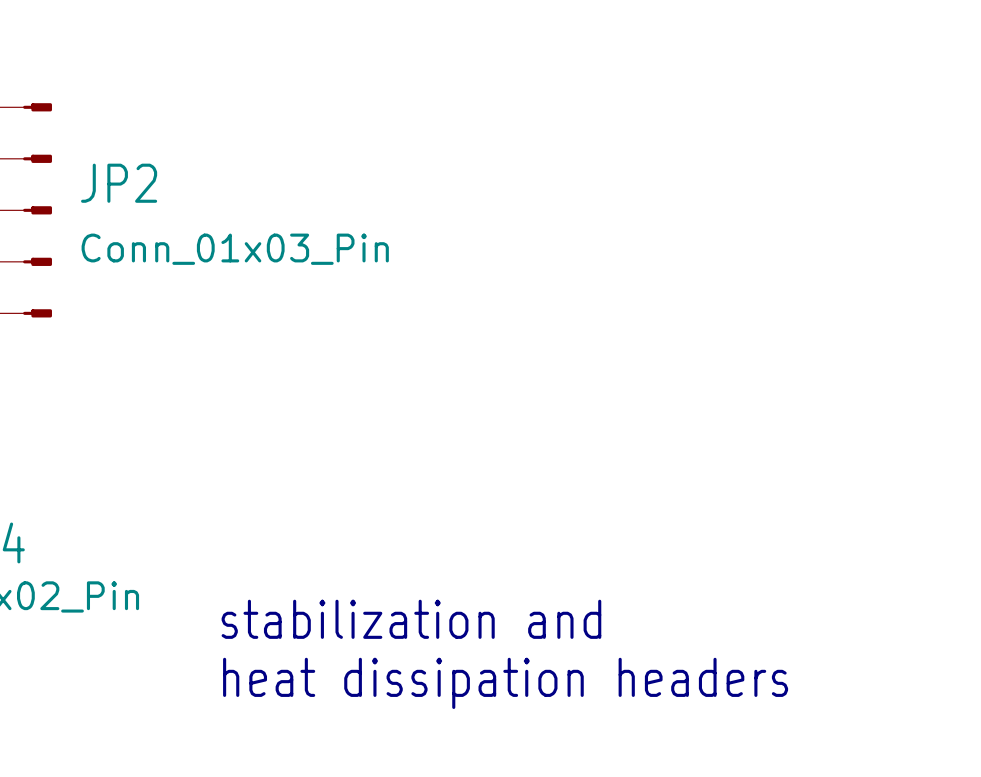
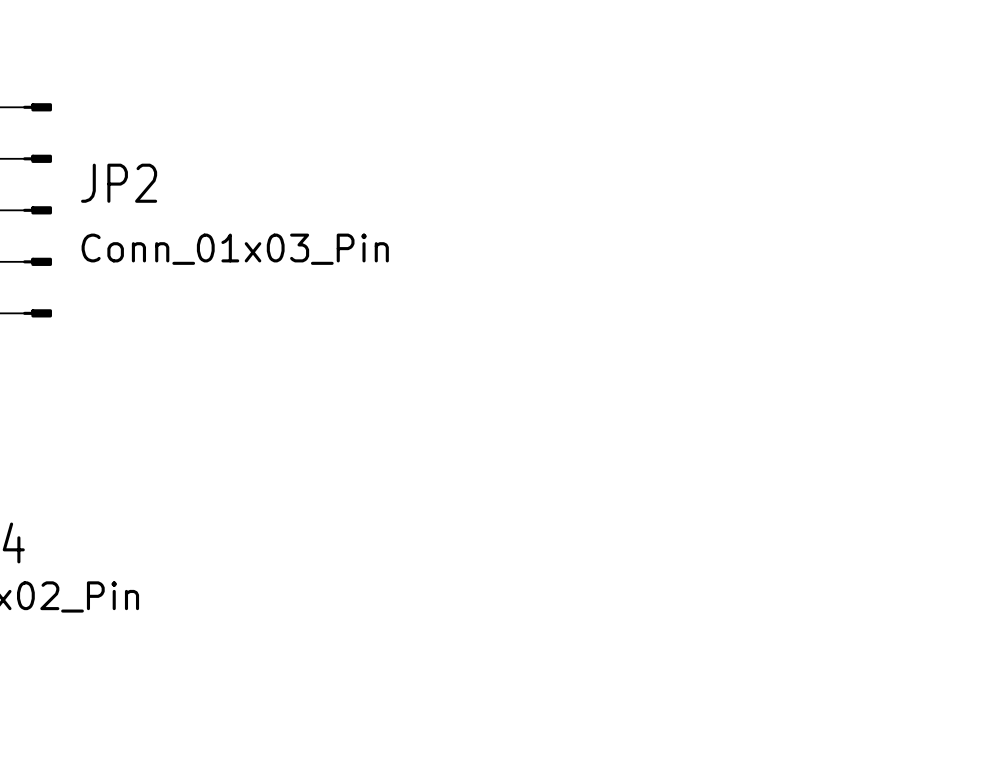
text: stabilization and (411, 619) -> none
text: heat dissipation headers (505, 683) -> none

